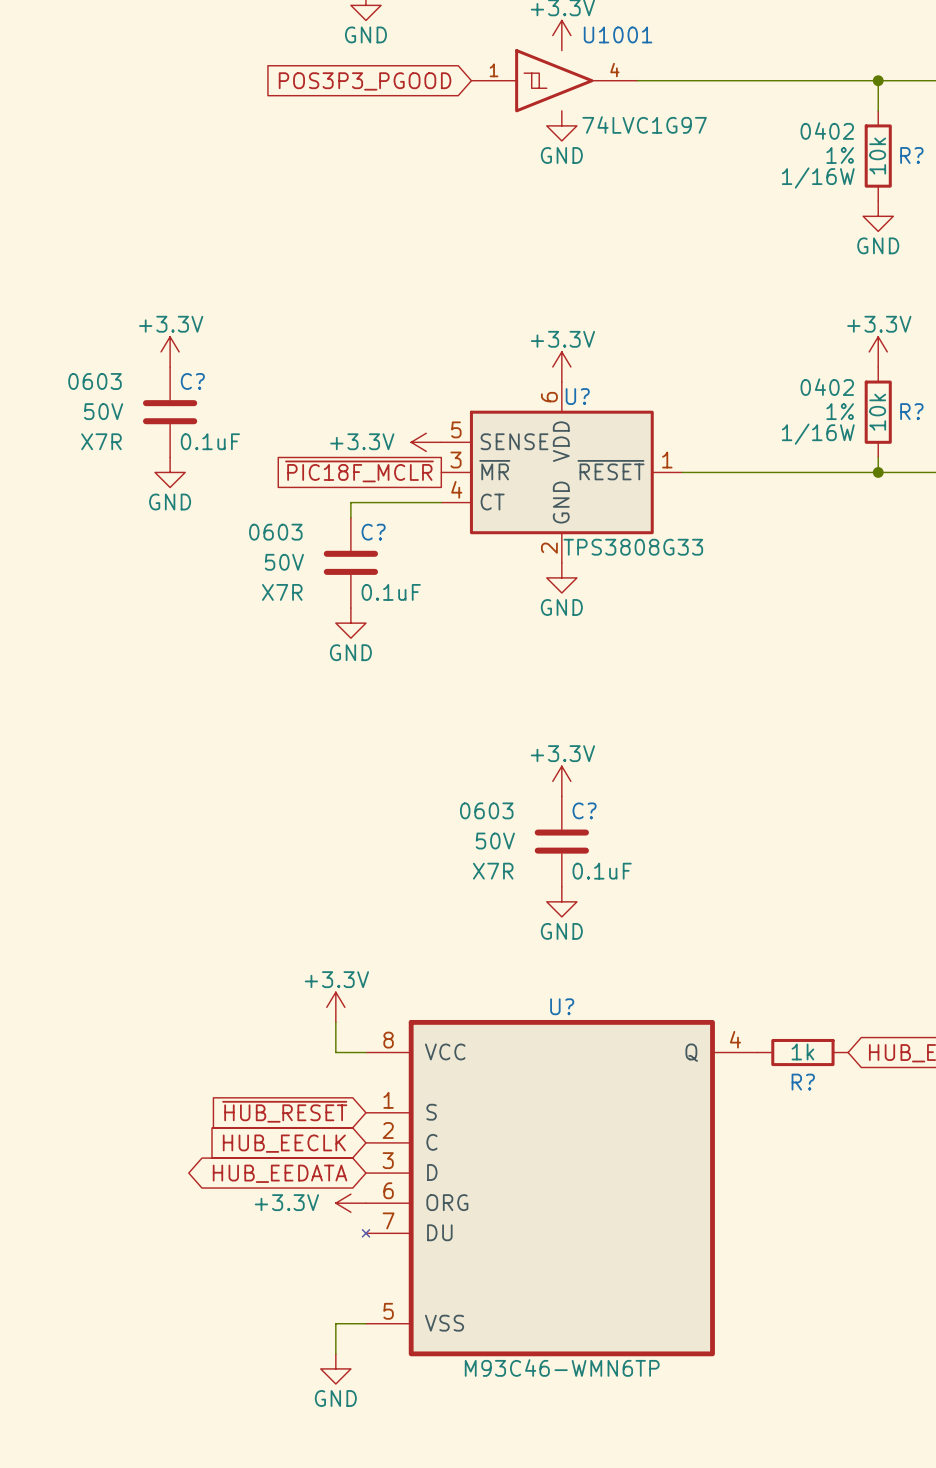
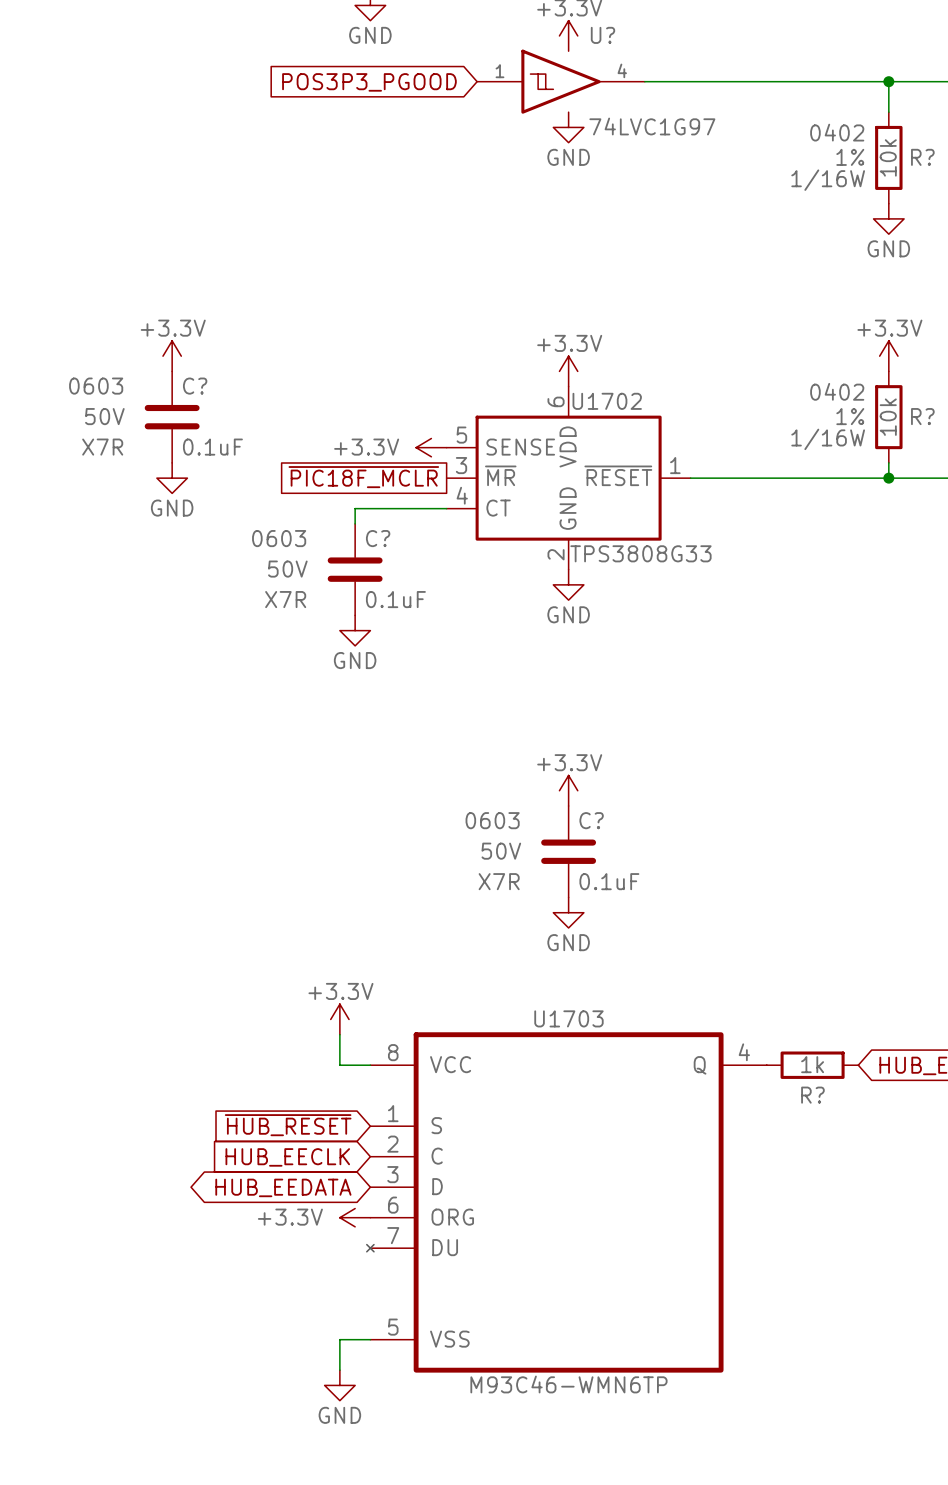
U1001 name: U1001 (618, 34) -> U? (602, 35)
U? name: U? (577, 396) -> U1702 (607, 401)
U? name: U? (562, 1006) -> U1703 (568, 1018)

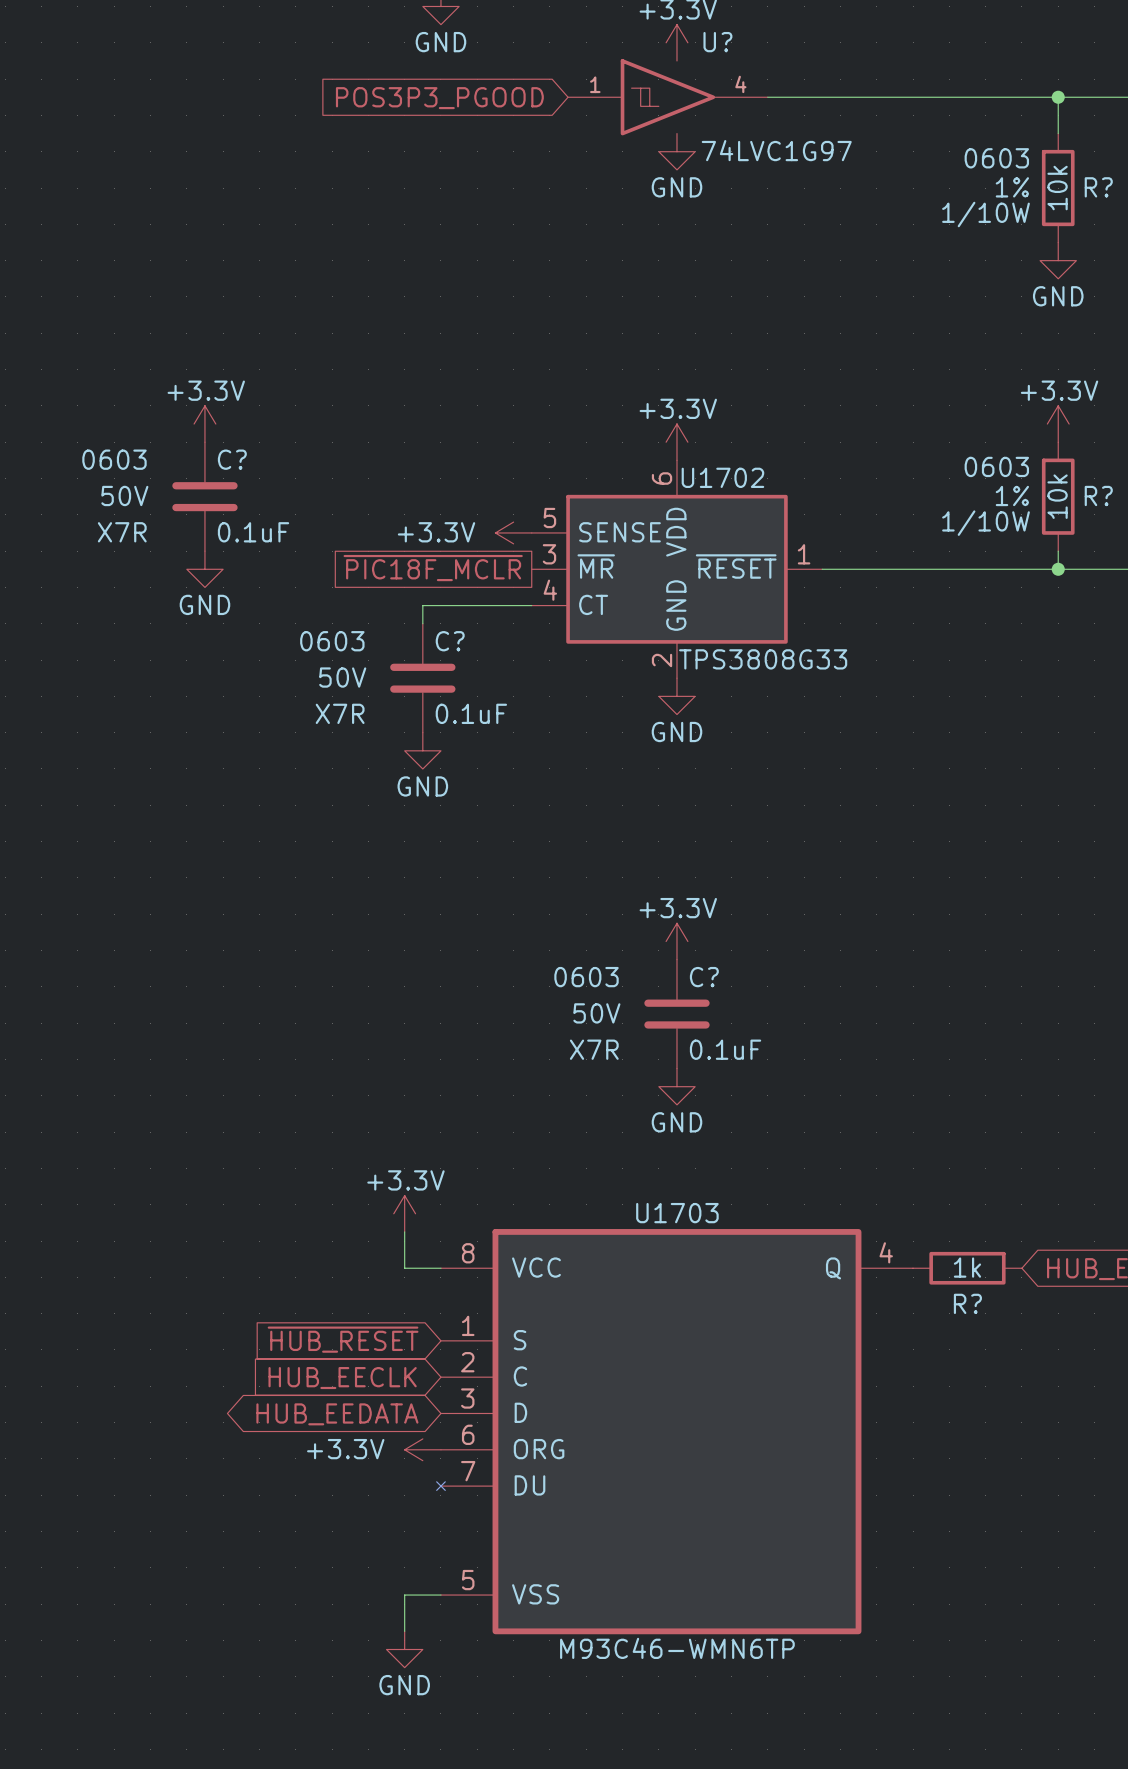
R? text: 0402 (837, 132) -> 0603 (996, 158)
R? text: 1/16W (828, 180) -> 1/10W (986, 214)
R? text: 0402 (837, 391) -> 0603 (996, 466)
R? text: 1/16W (828, 439) -> 1/10W (986, 523)

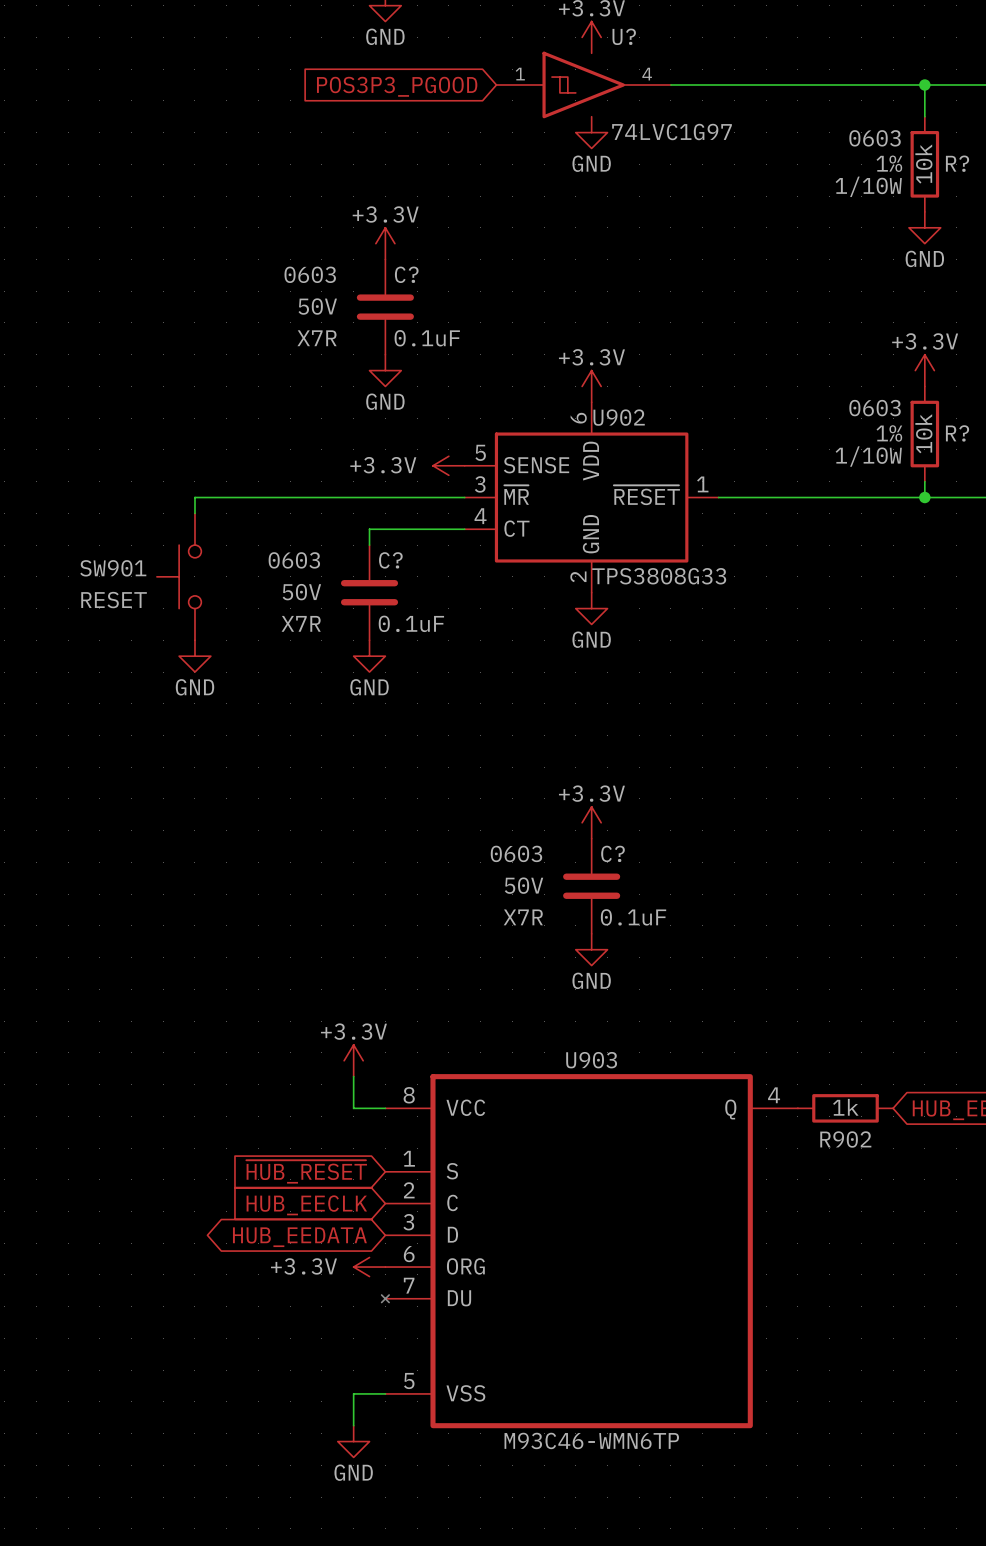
power symbol position: +3.3V (204, 424) -> +3.3V (385, 243)
power symbol: none -> GND (385, 370)
U1702 name: U1702 (722, 477) -> U902 (619, 417)
C? position: (204, 496) -> (385, 307)
global label: ~{PIC18F_MCLR} (433, 568) -> none
power symbol: GND (204, 569) -> none
wire: none -> (464, 497) (194, 497) (194, 513)
SW901: none -> RESET (179, 576)
power symbol: none -> GND (194, 656)
U1703 name: U1703 (677, 1213) -> U903 (591, 1060)
R? name: R? (967, 1303) -> R902 (845, 1139)

